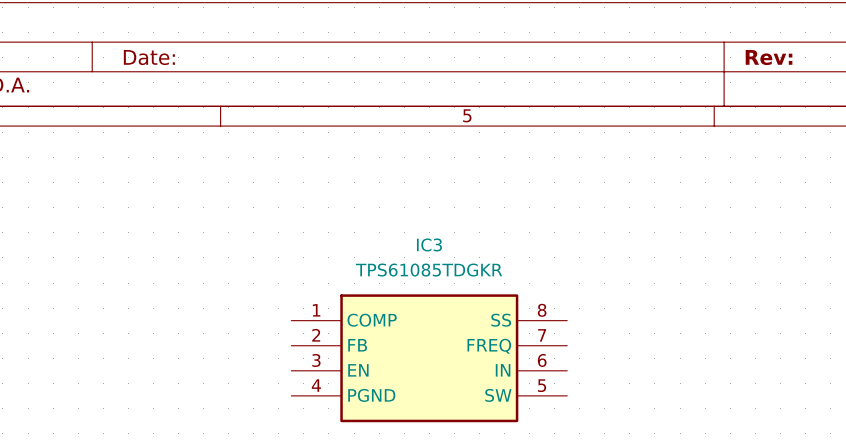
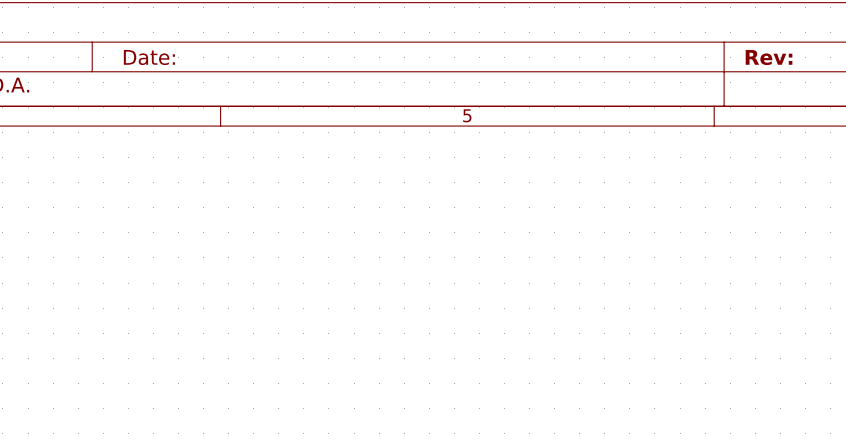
IC3: TPS61085TDGKR (429, 358) -> none

